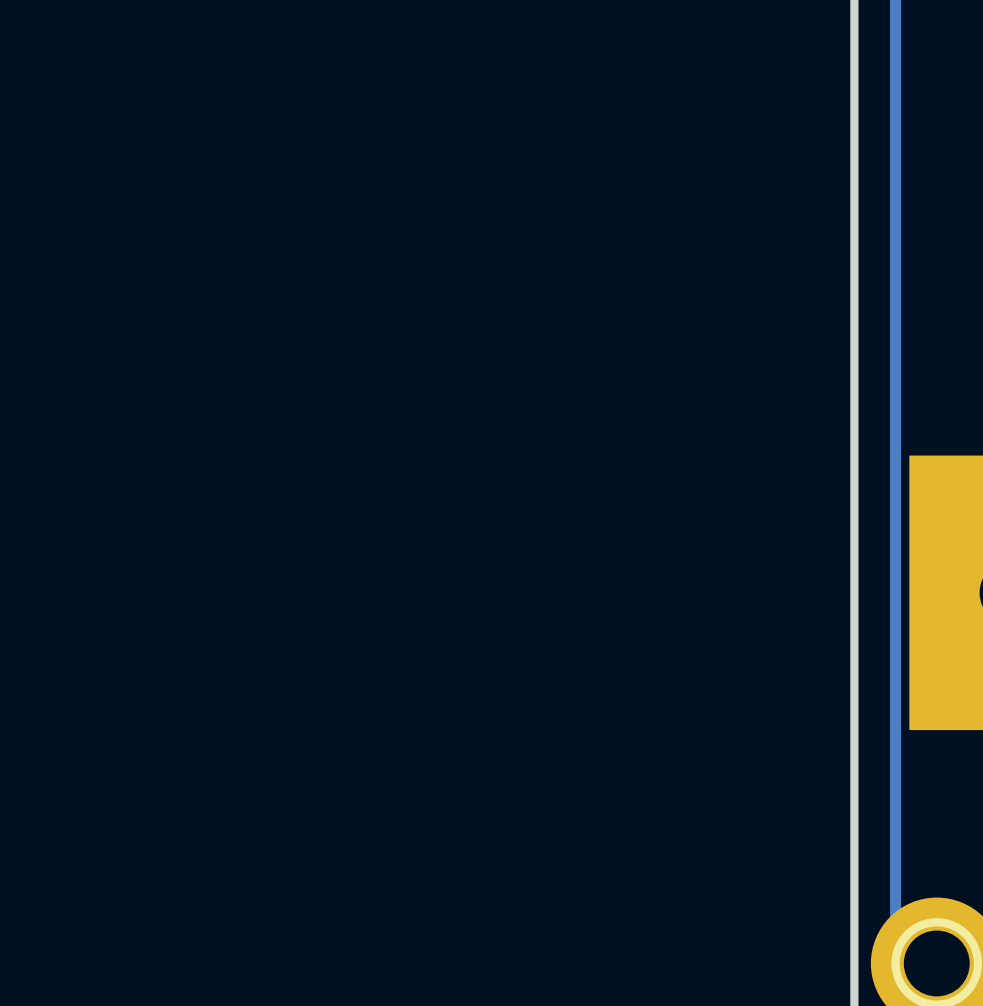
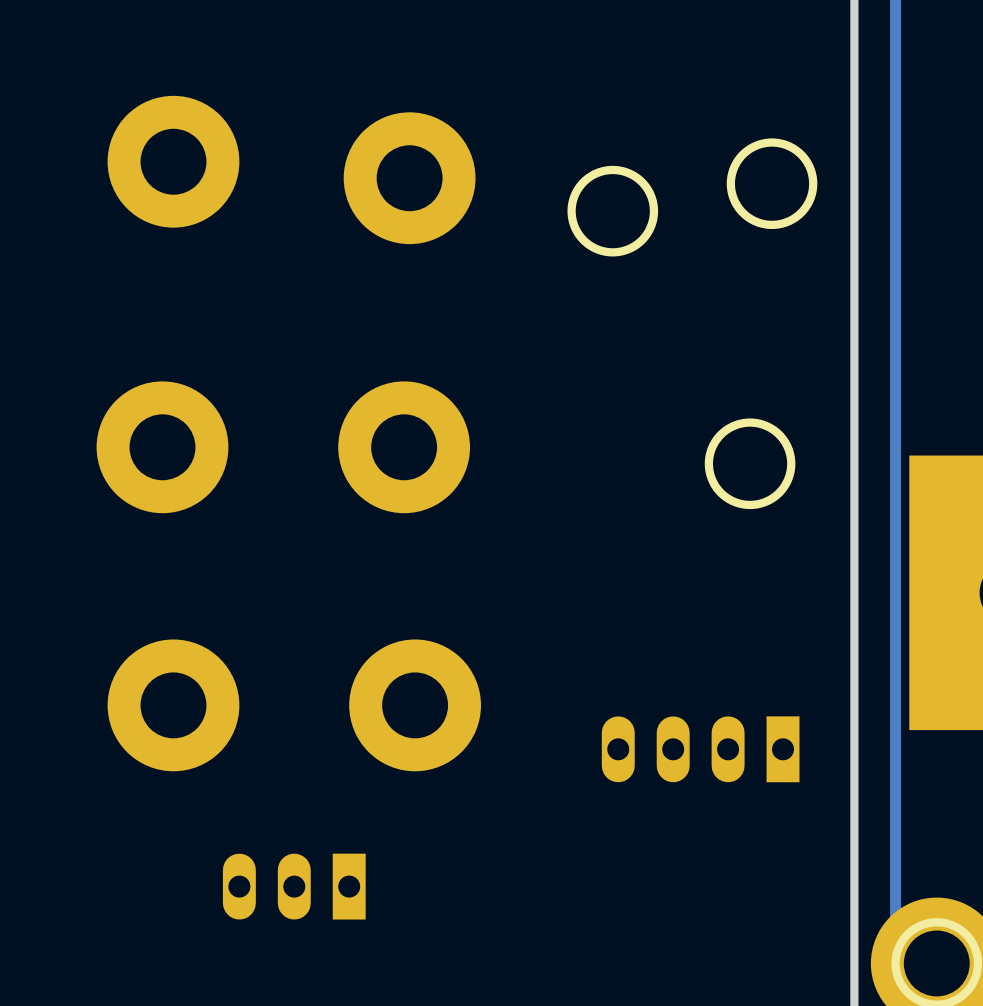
drawing: none -> [726, 138, 818, 230]
part: none -> (173, 161)
drawing: none -> [567, 165, 659, 257]
part: none -> (409, 178)
drawing: none -> [704, 418, 796, 510]
part: none -> (162, 447)
part: none -> (404, 447)
part: none -> (173, 705)
part: none -> (415, 705)
part: none -> (700, 749)
part: none -> (294, 886)

